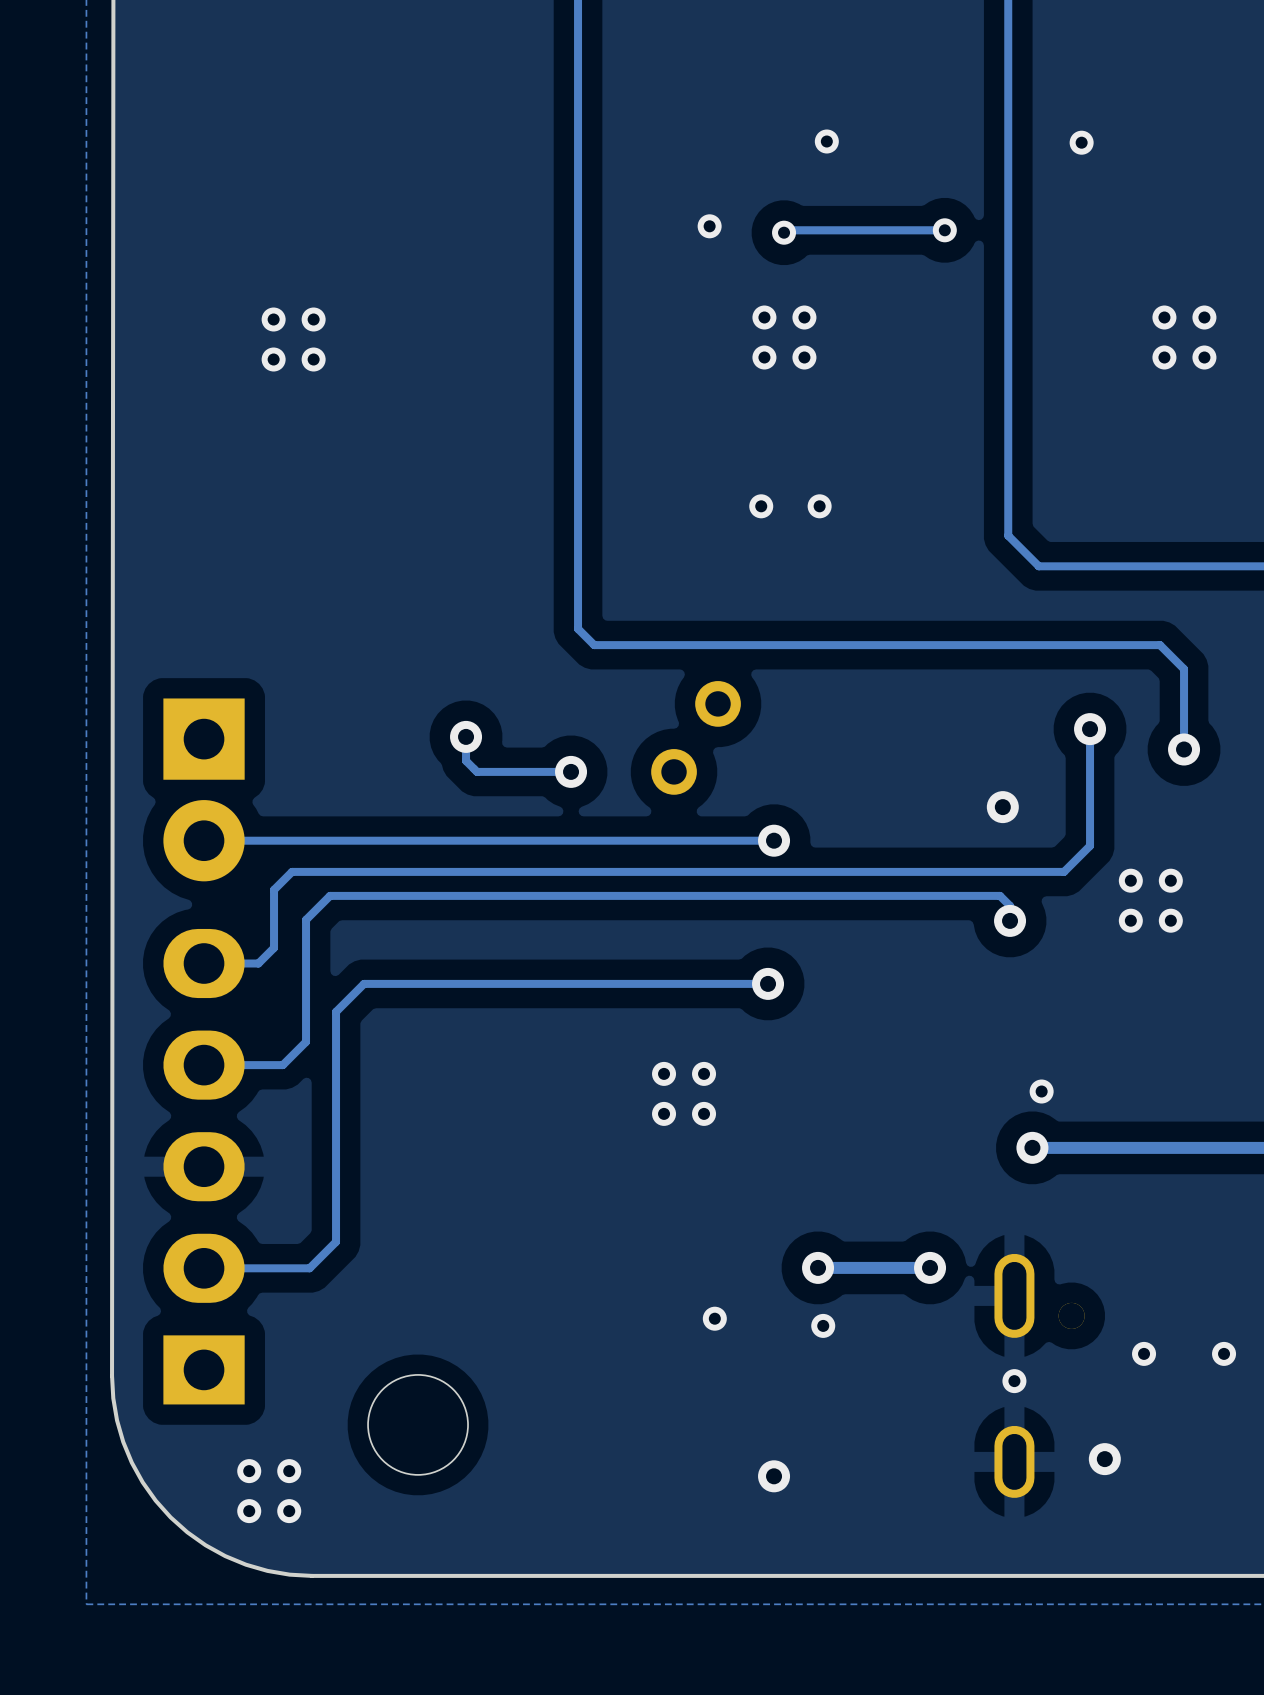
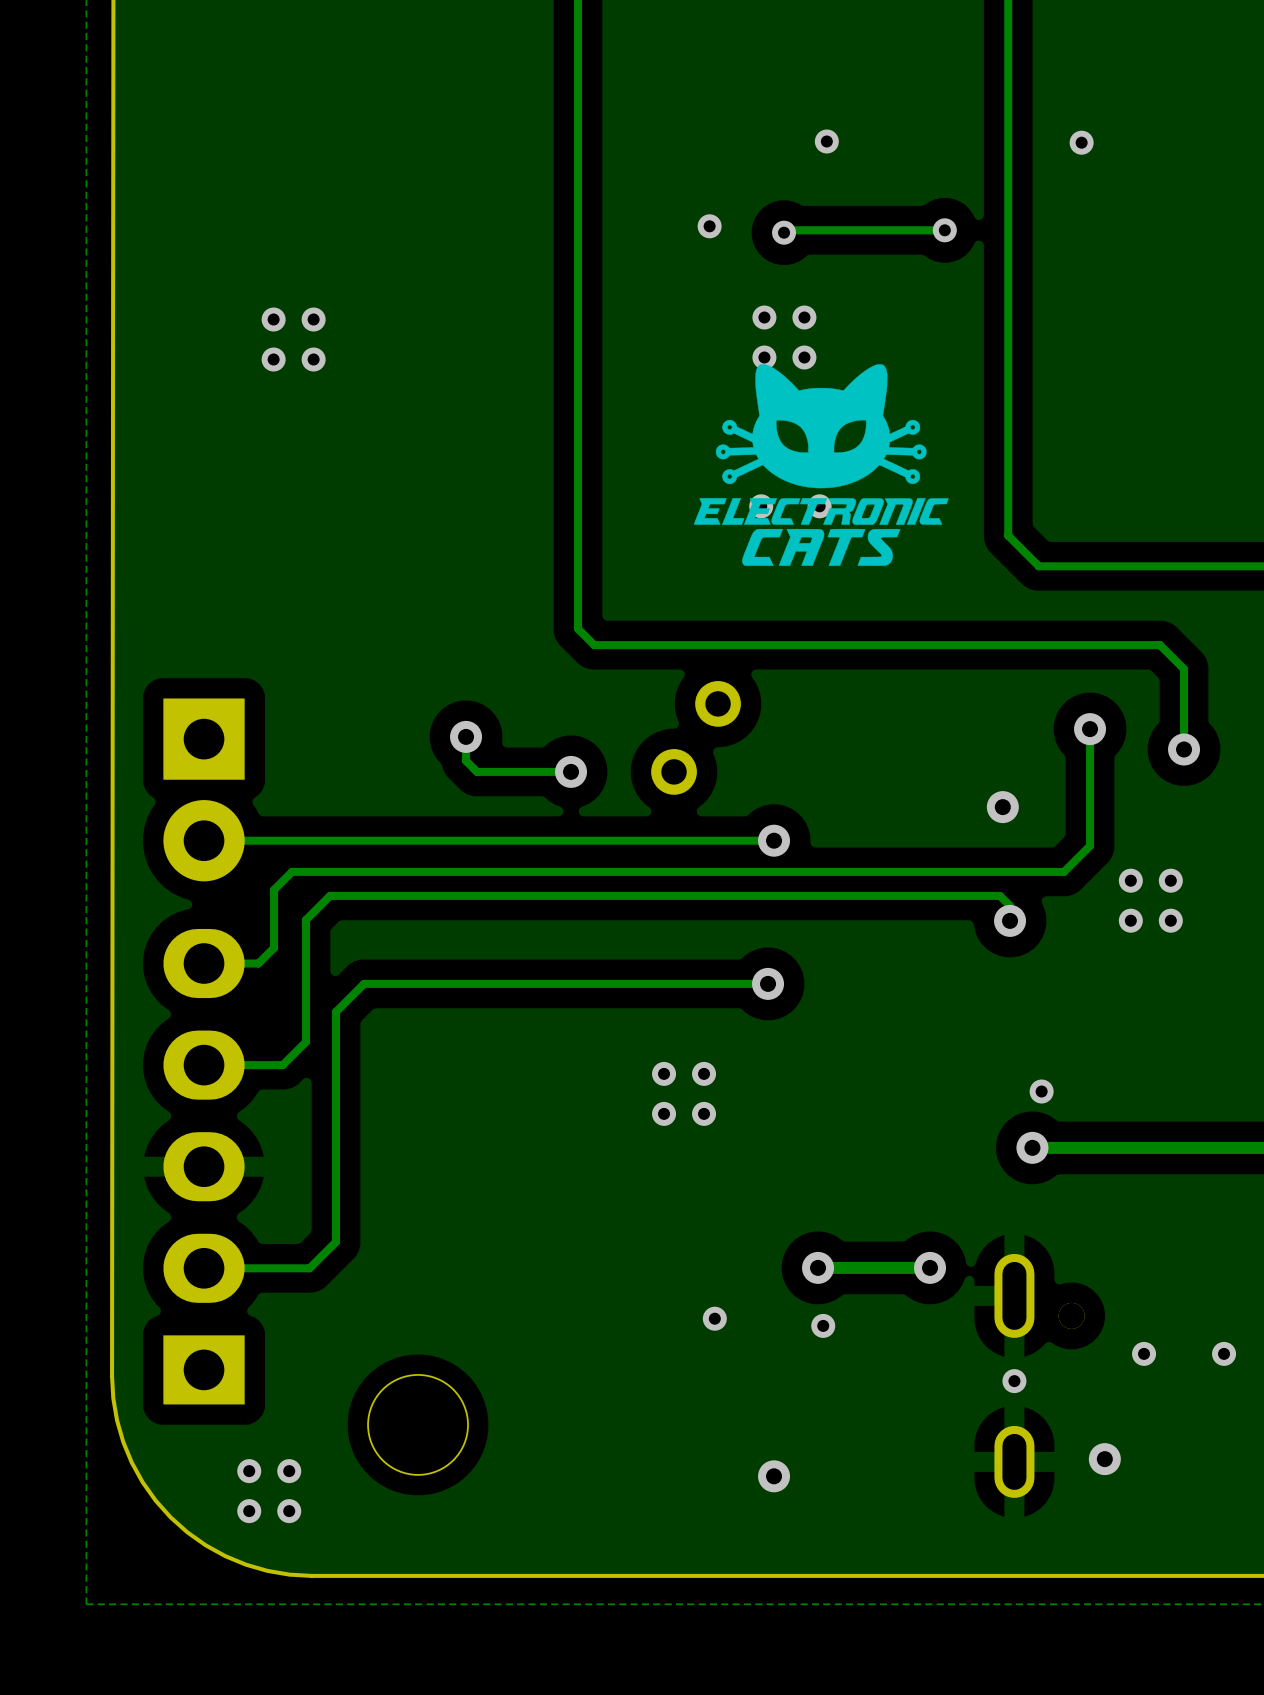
via: (1164, 317) -> none
via: (1204, 317) -> none
via: (1164, 357) -> none
via: (1204, 357) -> none
drawing: none -> [694, 364, 949, 566]

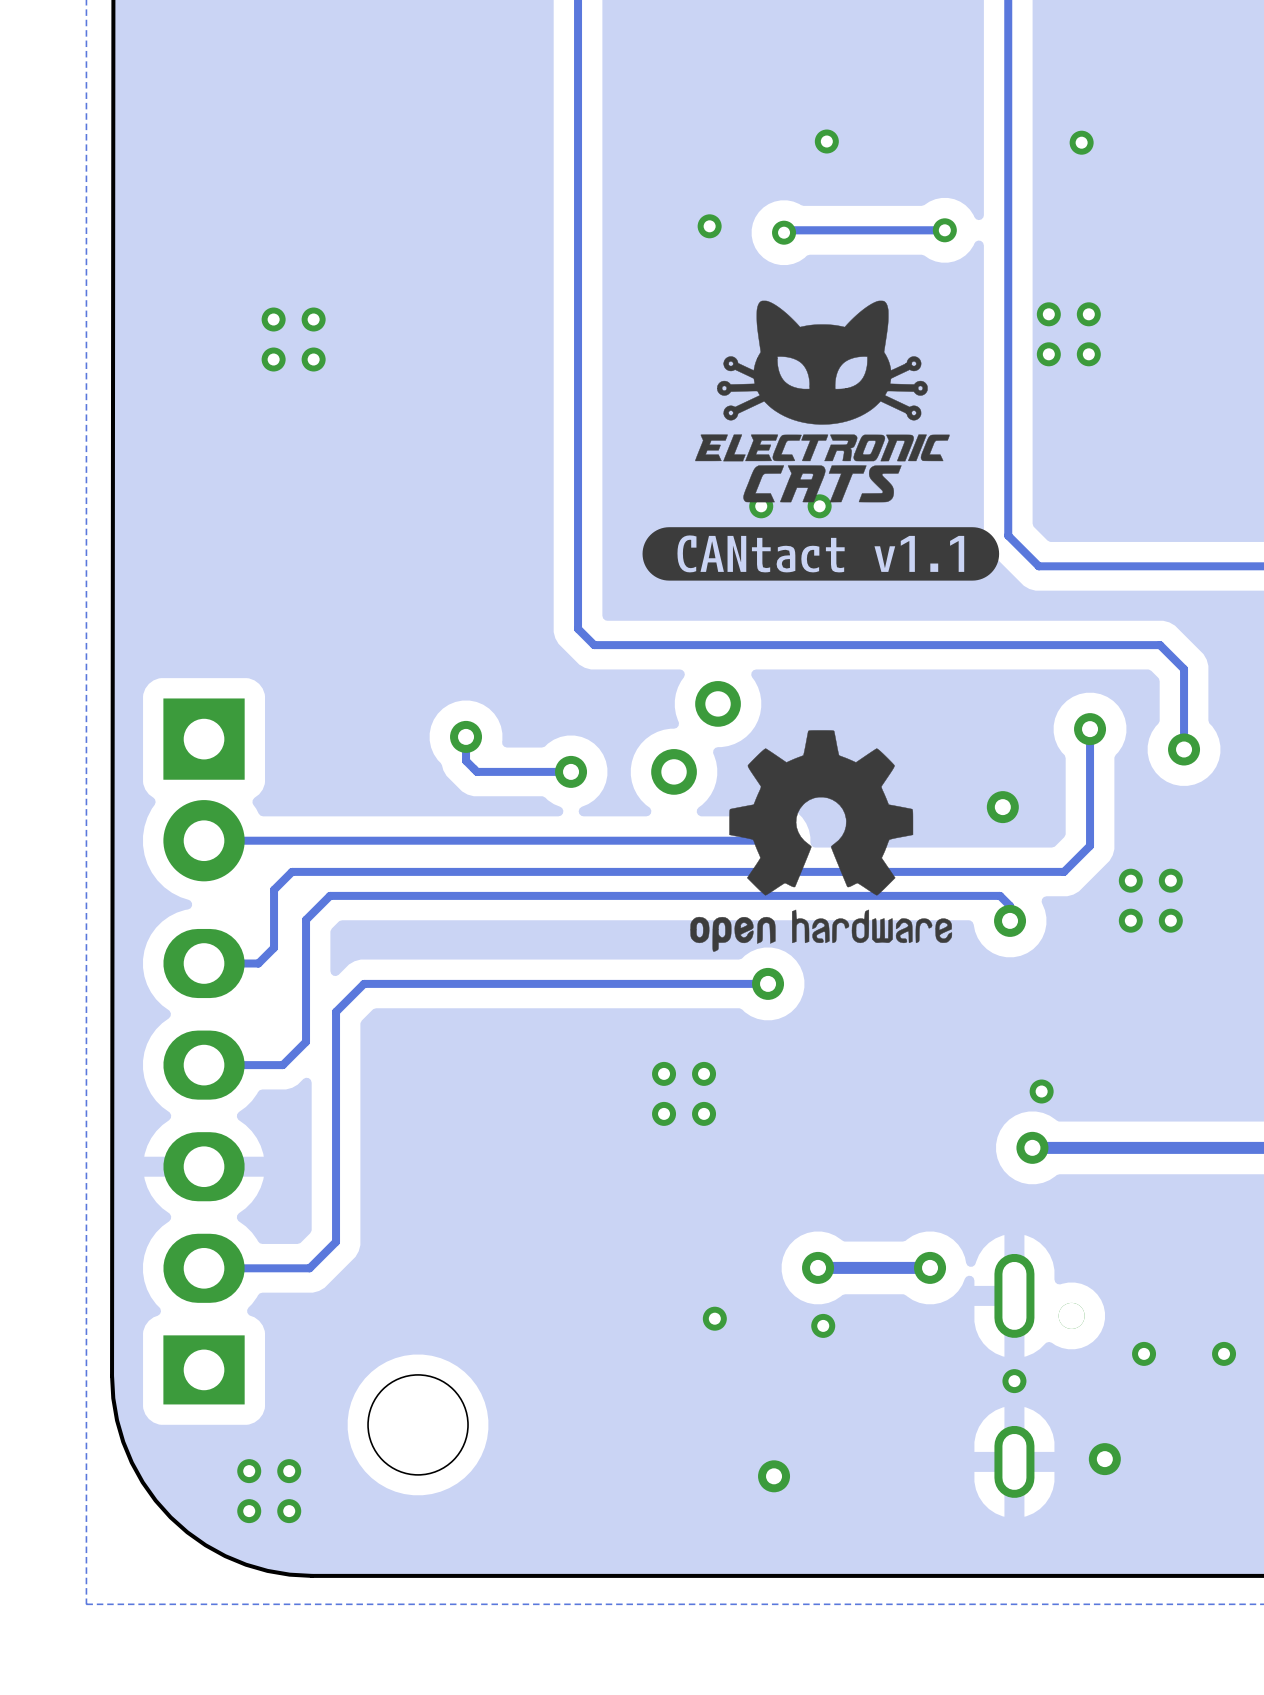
via: none -> (1048, 314)
via: none -> (1088, 314)
via: (764, 317) -> none
via: (804, 317) -> none
via: none -> (1048, 354)
via: none -> (1088, 354)
via: (764, 357) -> none
via: (804, 357) -> none
drawing position: (821, 465) -> (822, 401)
drawing: none -> [642, 527, 1000, 581]
drawing: none -> [690, 730, 953, 952]

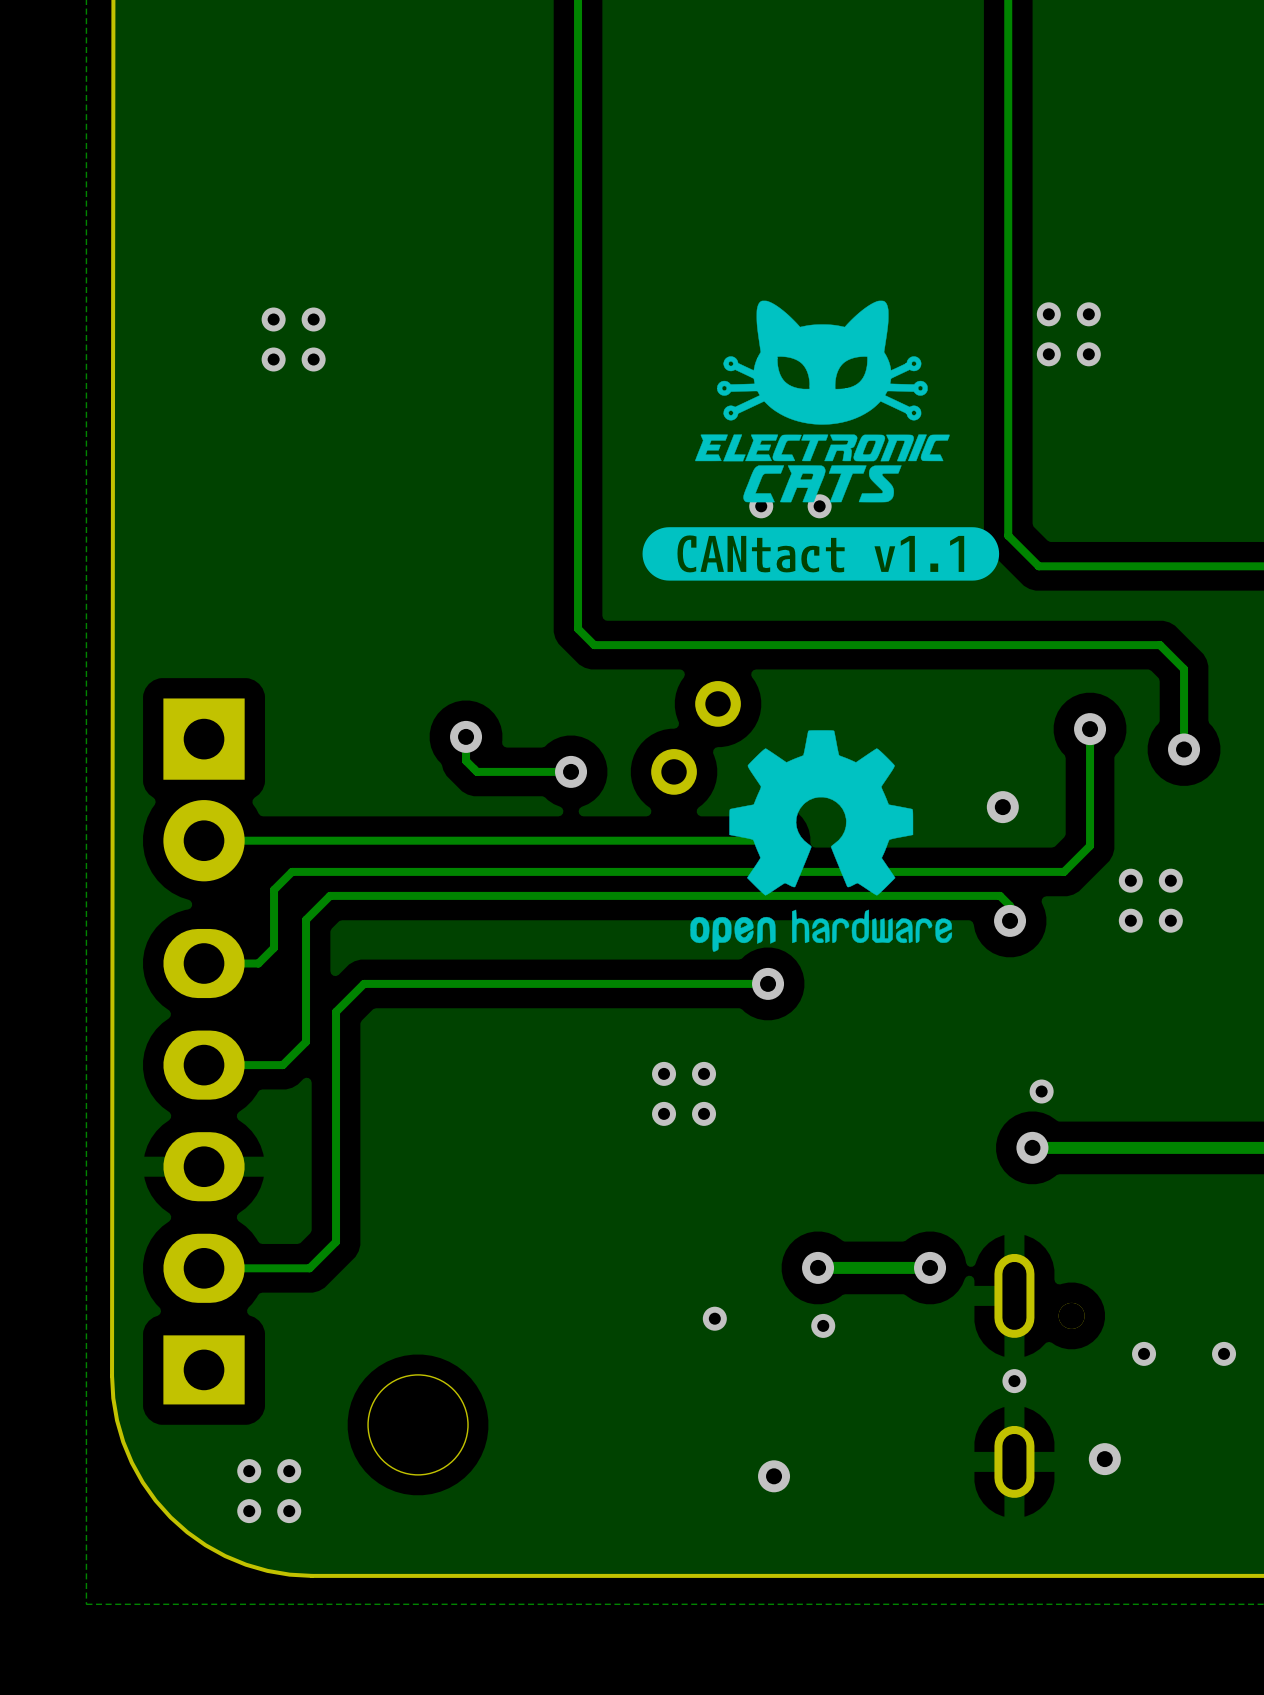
via: (826, 141) -> none
via: (1081, 142) -> none
via: (709, 226) -> none
track: (944, 230) (786, 230) (784, 232) -> none
via: (944, 230) -> none
via: (784, 232) -> none

